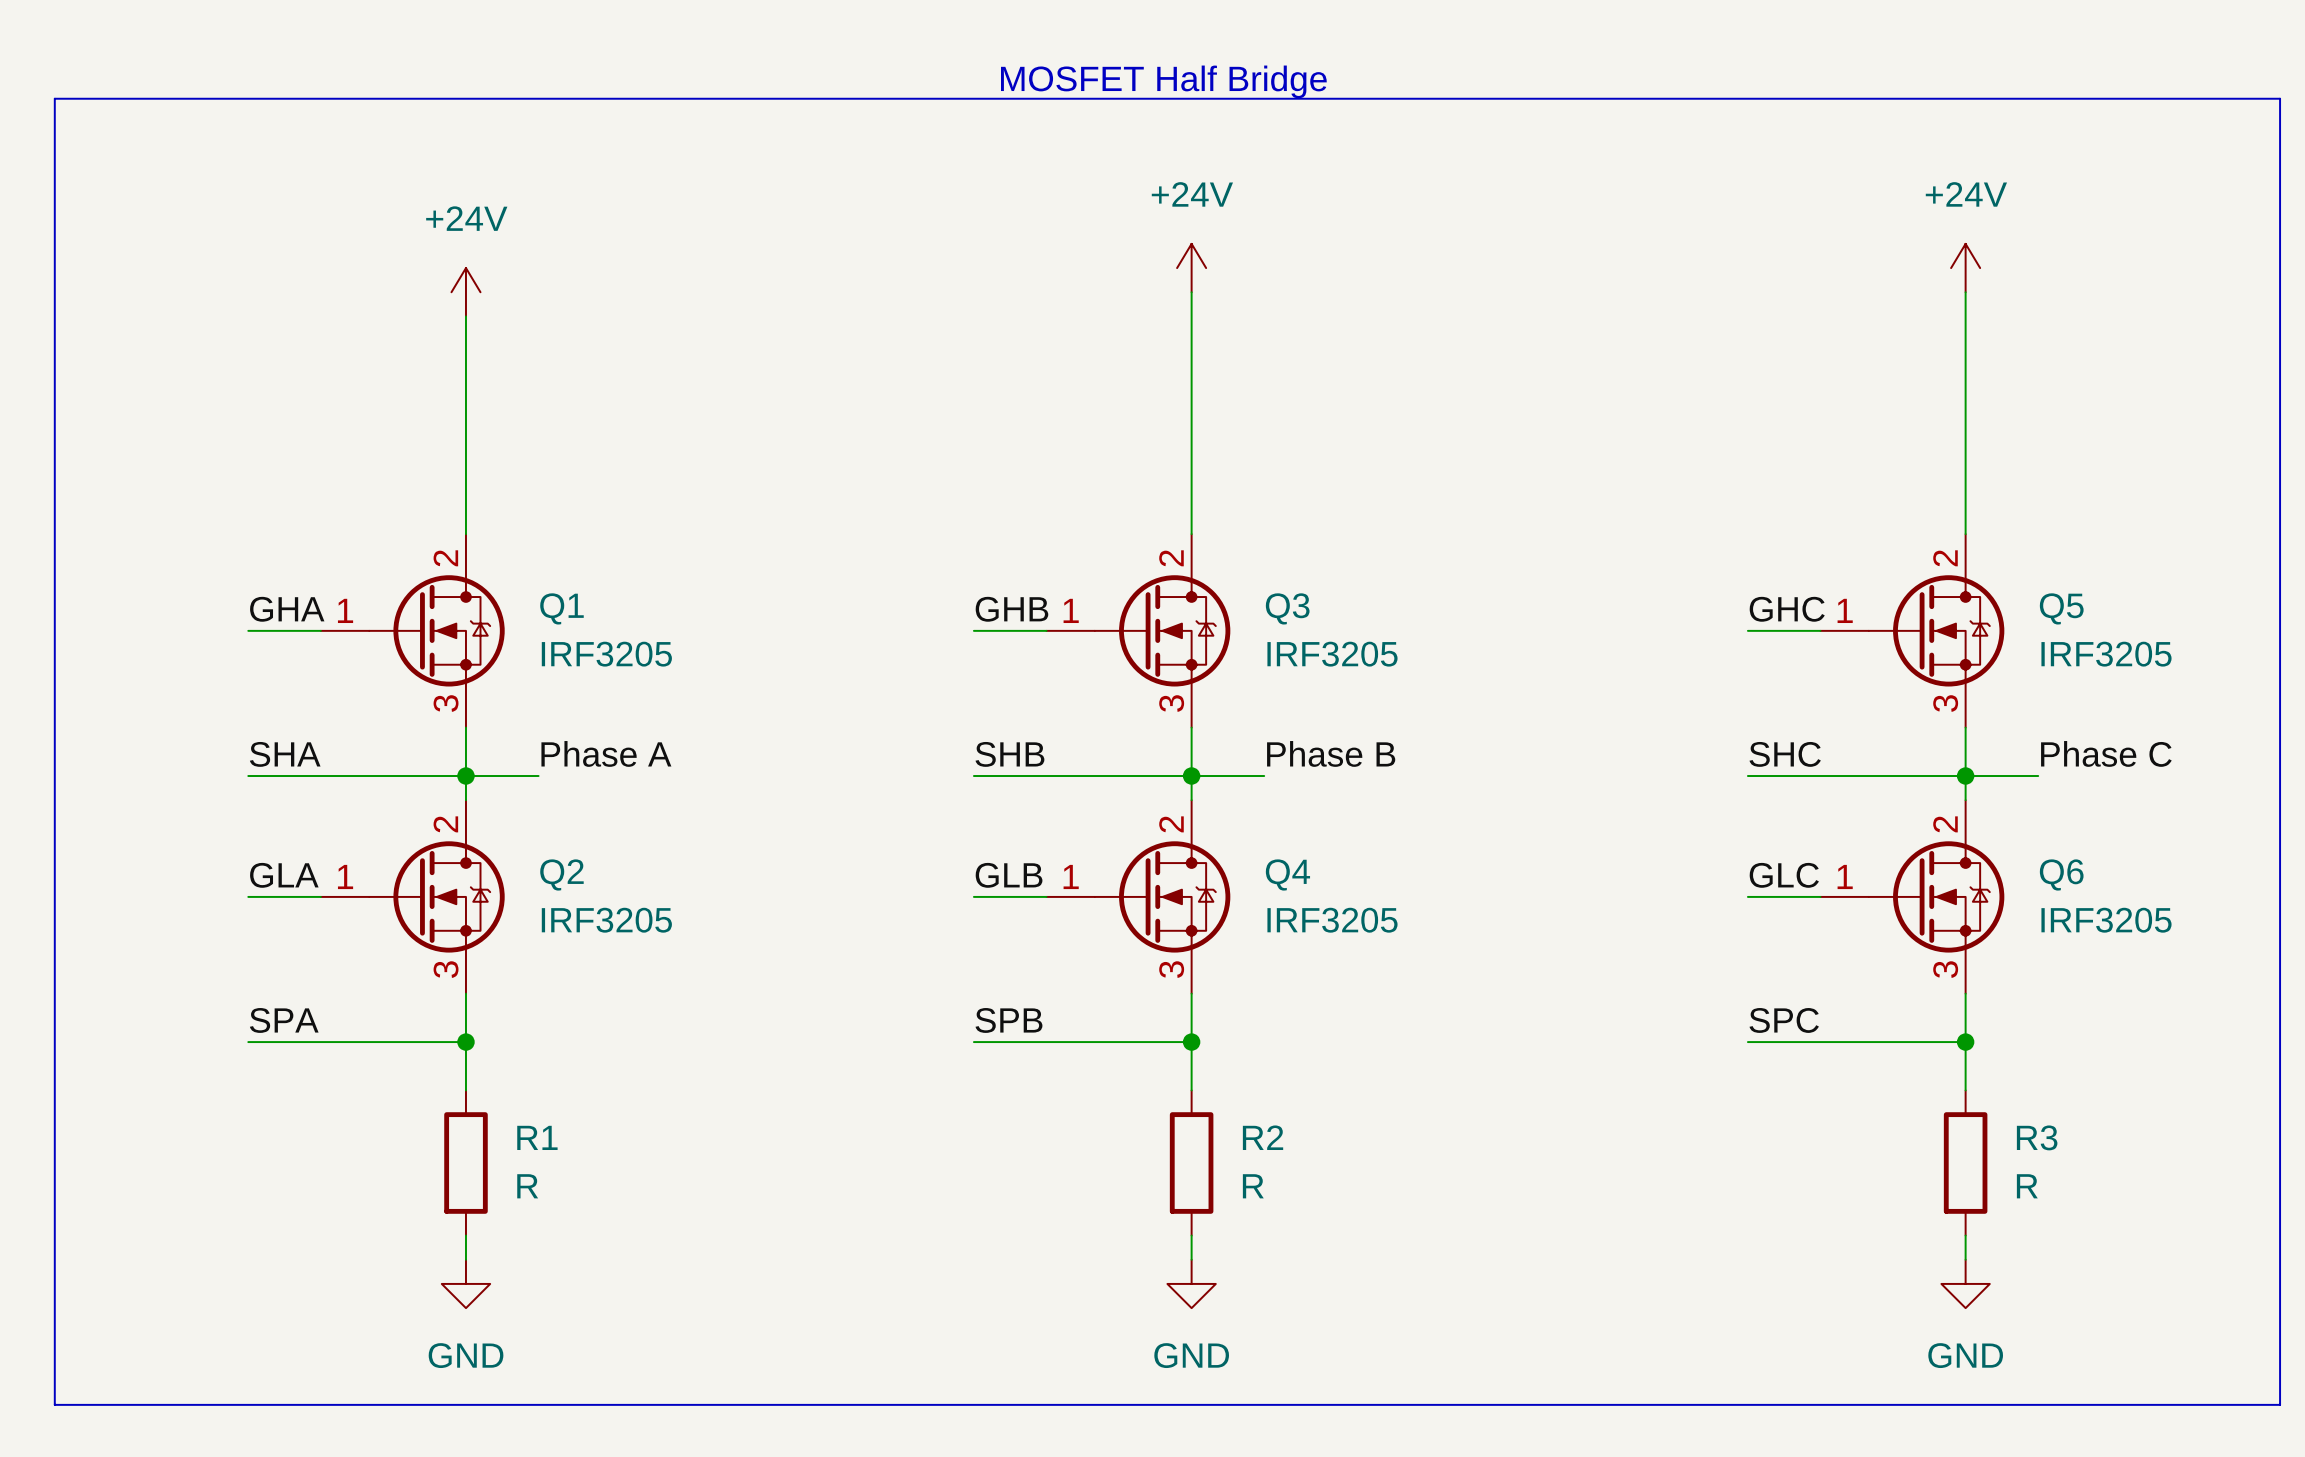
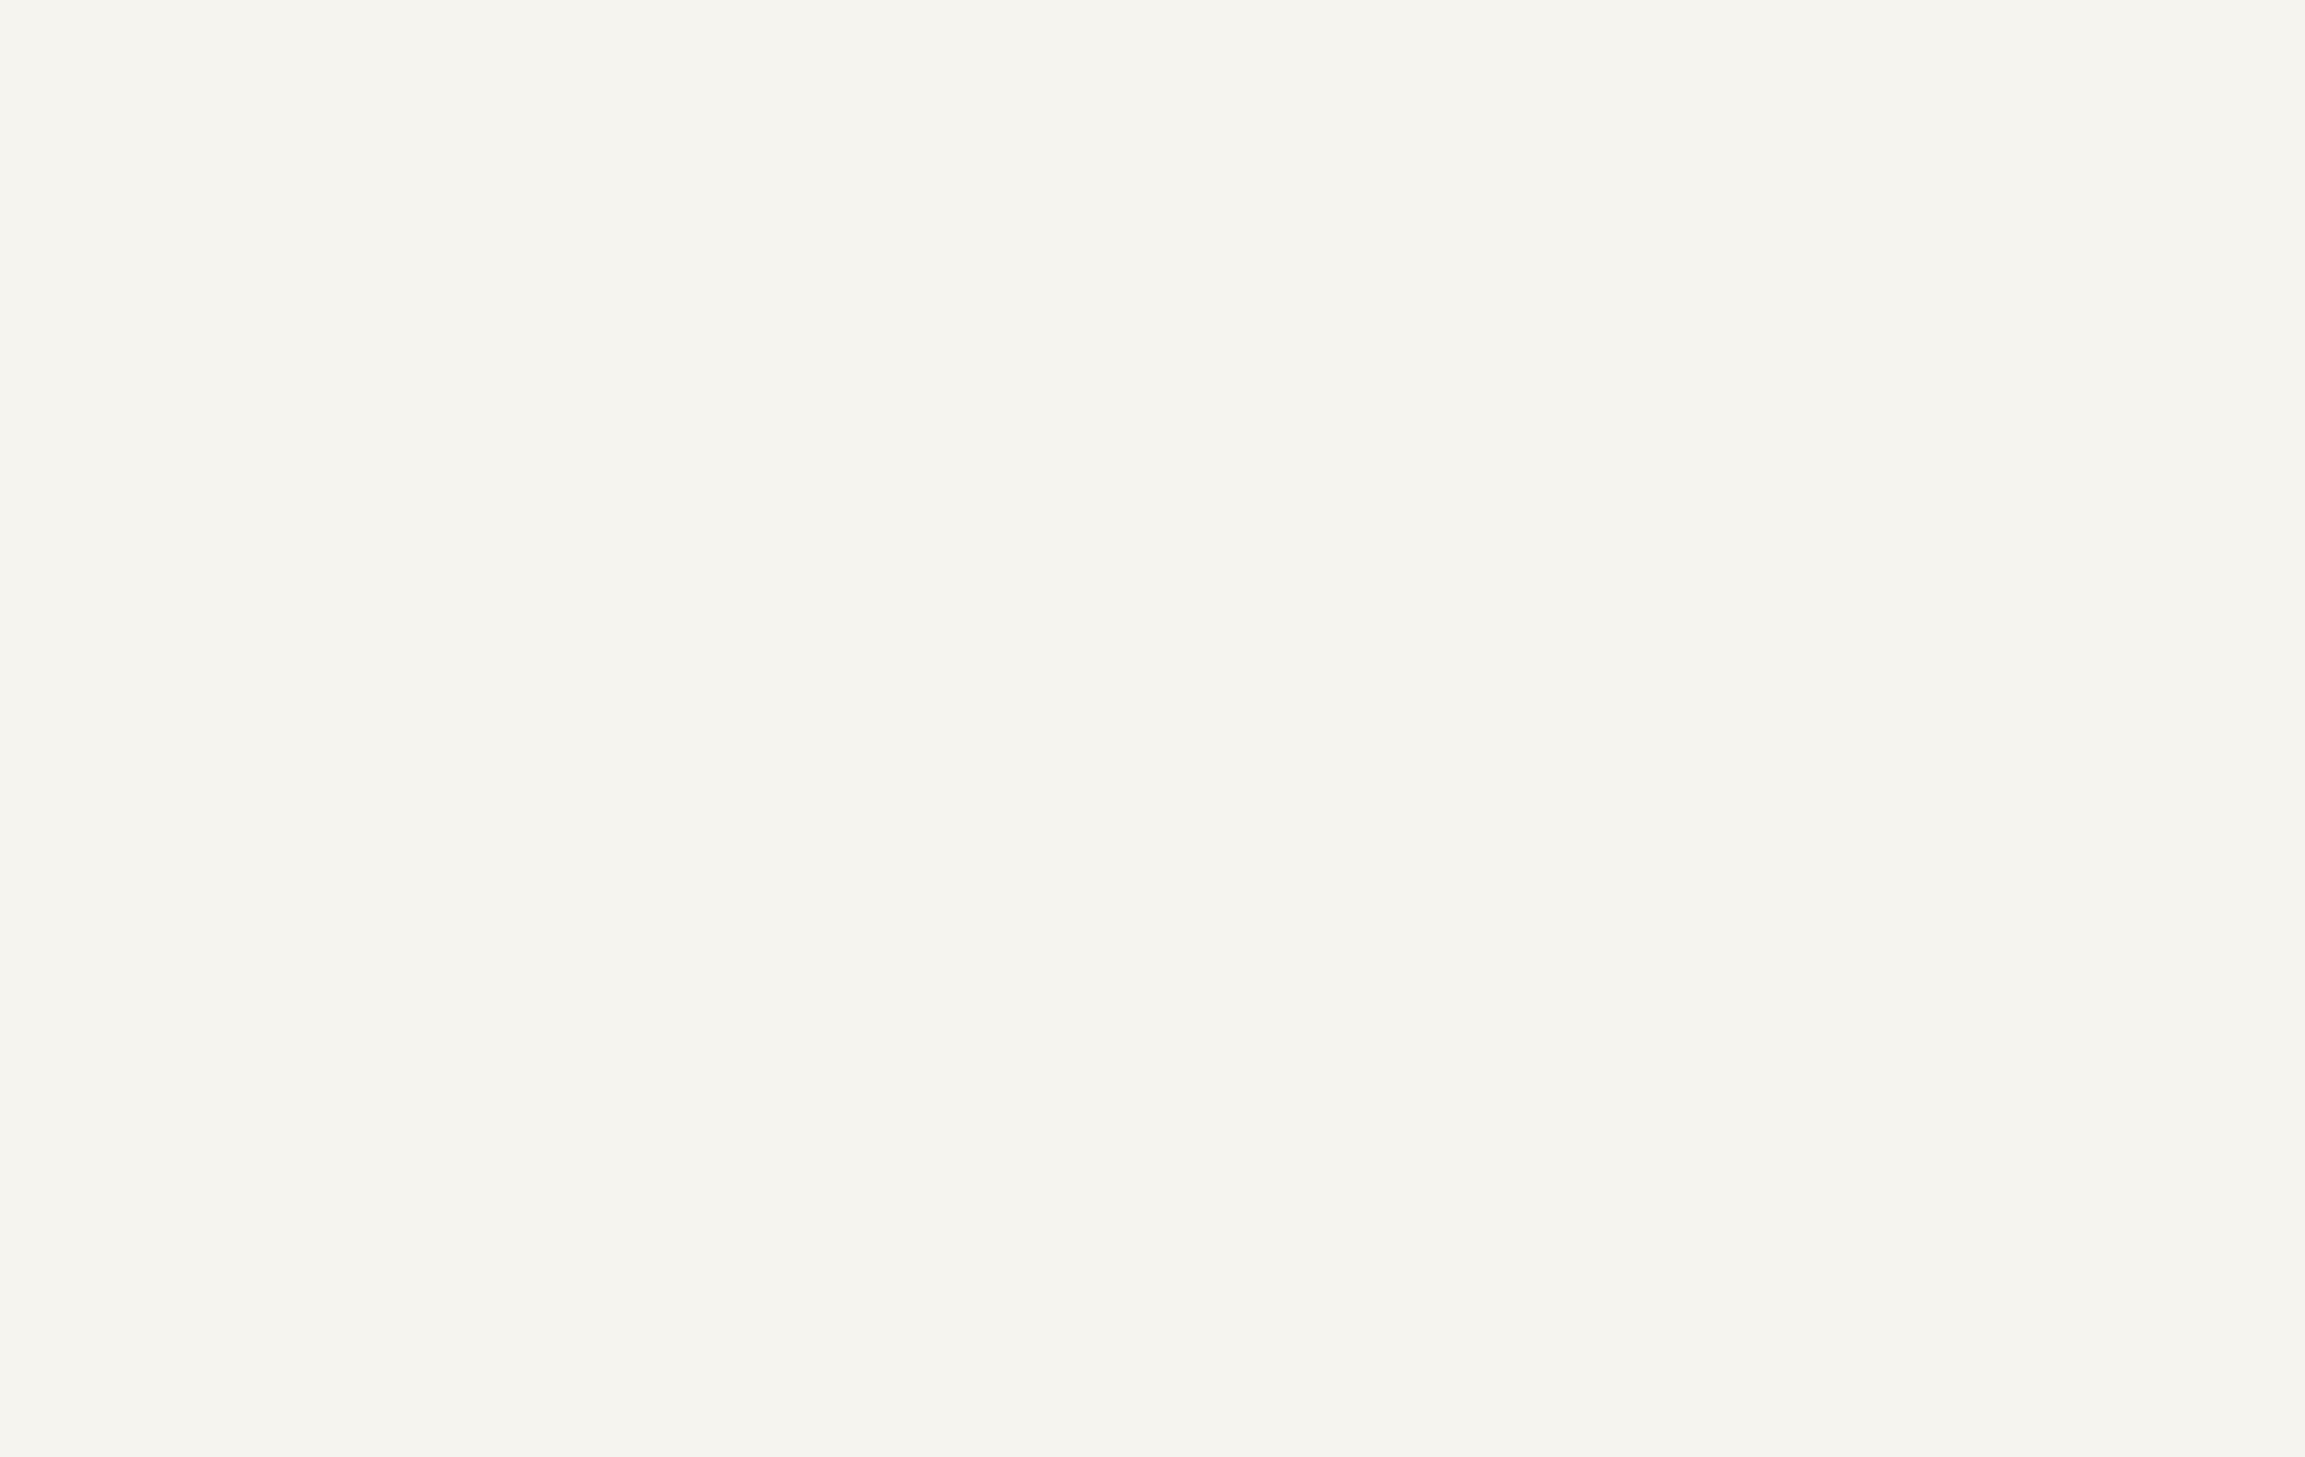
text: MOSFET Half Bridge (1163, 81) -> none
line: (54, 98) (2280, 98) (2280, 1404) (54, 1404) (54, 98) -> none
power symbol: +24V (1191, 268) -> none
power symbol: +24V (1965, 268) -> none
power symbol: +24V (465, 292) -> none
wire: (1191, 292) (1191, 534) -> none
wire: (1965, 292) (1965, 534) -> none
wire: (465, 316) (465, 534) -> none
label: GHA (287, 609) -> none
label: GHB (1011, 609) -> none
label: GHC (1787, 609) -> none
wire: (248, 630) (320, 630) -> none
Q1: IRF3205 (412, 630) -> none
wire: (973, 630) (1046, 630) -> none
Q3: IRF3205 (1138, 630) -> none
wire: (1747, 630) (1820, 630) -> none
Q5: IRF3205 (1912, 630) -> none
wire: (465, 727) (465, 800) -> none
wire: (1191, 727) (1191, 800) -> none
wire: (1965, 727) (1965, 800) -> none
label: Phase A (606, 753) -> none
label: Phase B (1331, 753) -> none
label: Phase C (2106, 753) -> none
label: SHA (285, 754) -> none
label: SHB (1009, 754) -> none
label: SHC (1785, 754) -> none
wire: (248, 776) (538, 776) -> none
junction: (465, 776) -> none
wire: (973, 776) (1264, 776) -> none
junction: (1191, 776) -> none
wire: (1747, 776) (2038, 776) -> none
junction: (1965, 776) -> none
label: GLA (284, 875) -> none
label: GLB (1009, 875) -> none
label: GLC (1784, 875) -> none
wire: (248, 896) (320, 896) -> none
Q2: IRF3205 (412, 896) -> none
wire: (973, 896) (1046, 896) -> none
Q4: IRF3205 (1138, 896) -> none
wire: (1747, 896) (1820, 896) -> none
Q6: IRF3205 (1912, 896) -> none
wire: (465, 993) (465, 1090) -> none
wire: (1191, 993) (1191, 1090) -> none
wire: (1965, 993) (1965, 1090) -> none
label: SPA (284, 1020) -> none
label: SPB (1008, 1020) -> none
label: SPC (1784, 1020) -> none
wire: (248, 1042) (465, 1042) -> none
junction: (465, 1042) -> none
wire: (973, 1042) (1191, 1042) -> none
junction: (1191, 1042) -> none
wire: (1747, 1042) (1965, 1042) -> none
junction: (1965, 1042) -> none
R1: R (465, 1163) -> none
R2: R (1191, 1163) -> none
R3: R (1965, 1163) -> none
wire: (465, 1235) (465, 1259) -> none
wire: (1191, 1235) (1191, 1259) -> none
wire: (1965, 1235) (1965, 1259) -> none
power symbol: GND (465, 1283) -> none
power symbol: GND (1191, 1283) -> none
power symbol: GND (1965, 1283) -> none

